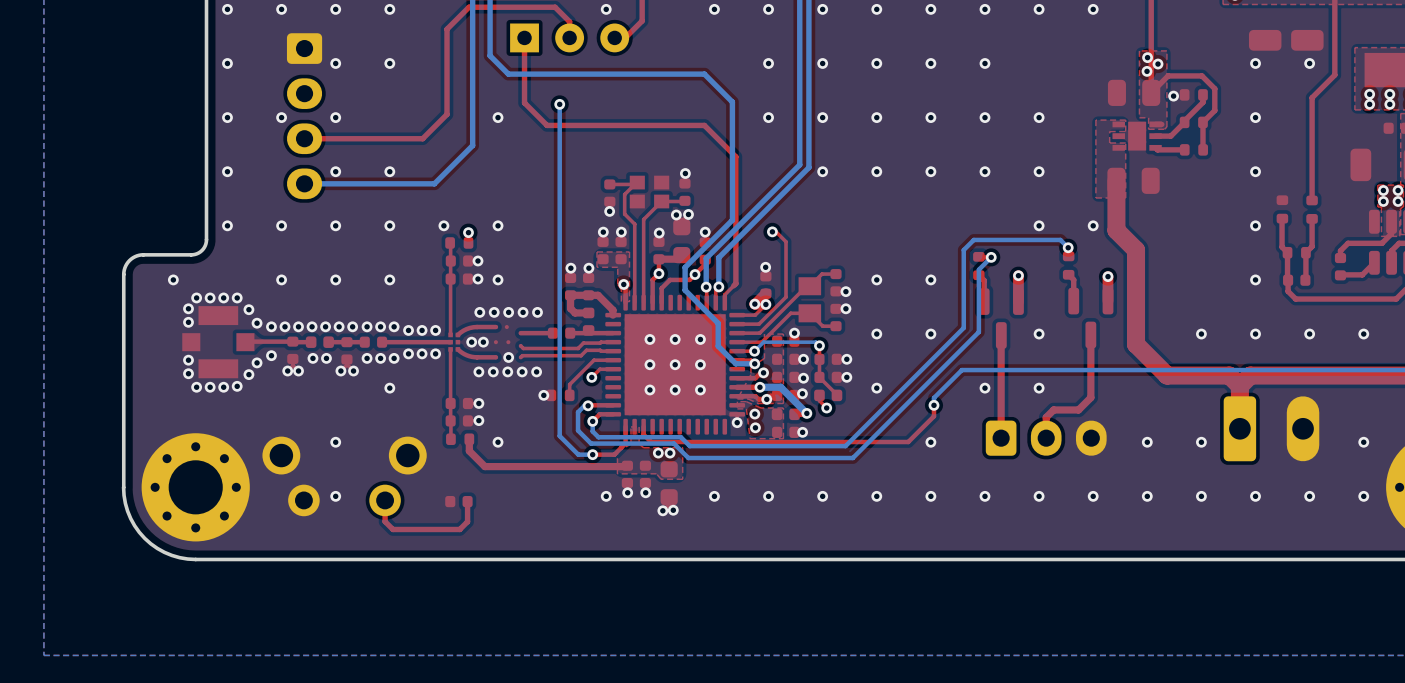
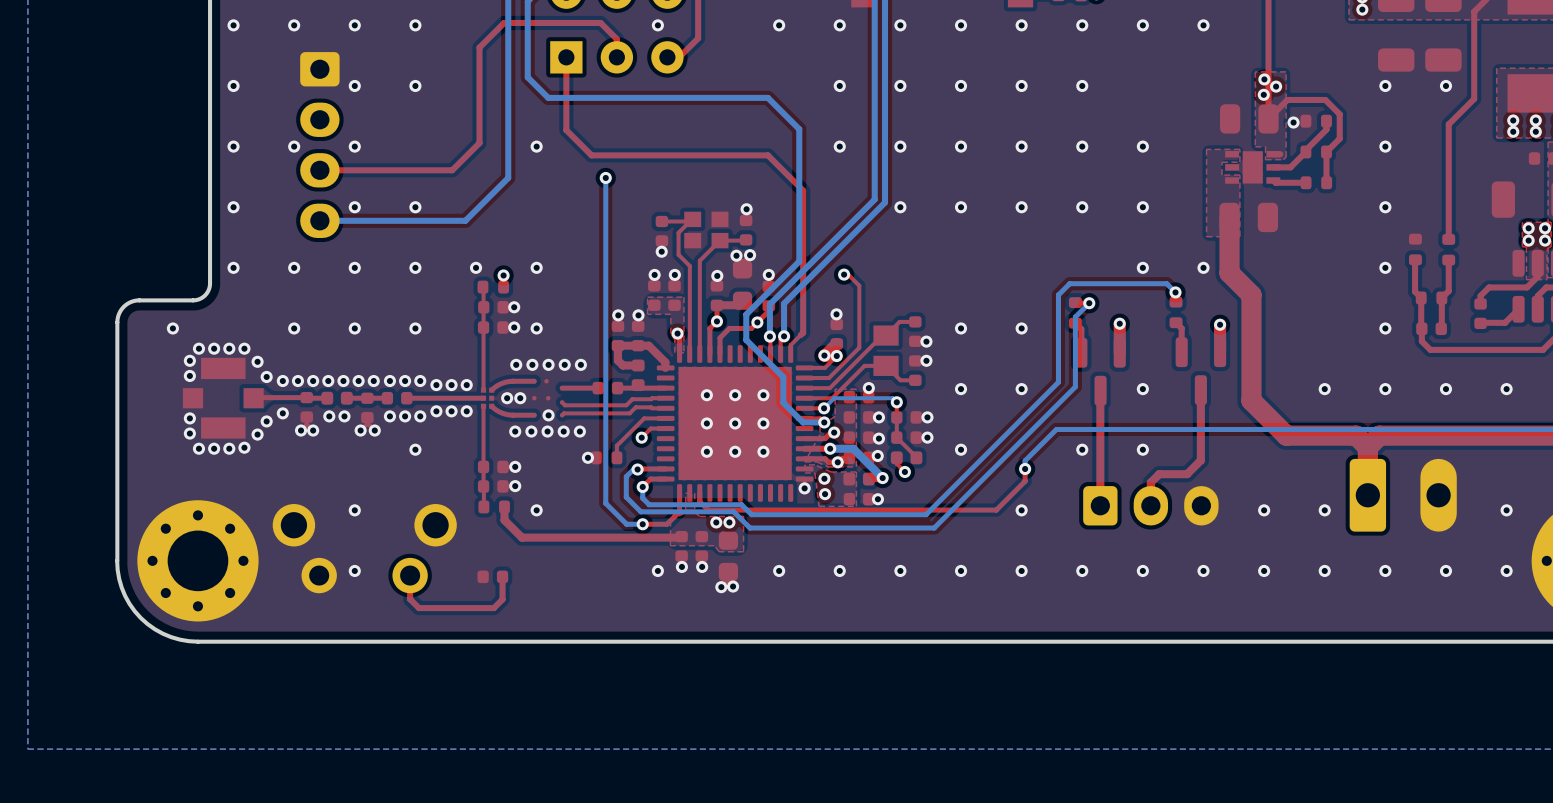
bottom track: (559, 104) (559, 145) -> none
via position: (559, 104) -> (605, 177)

